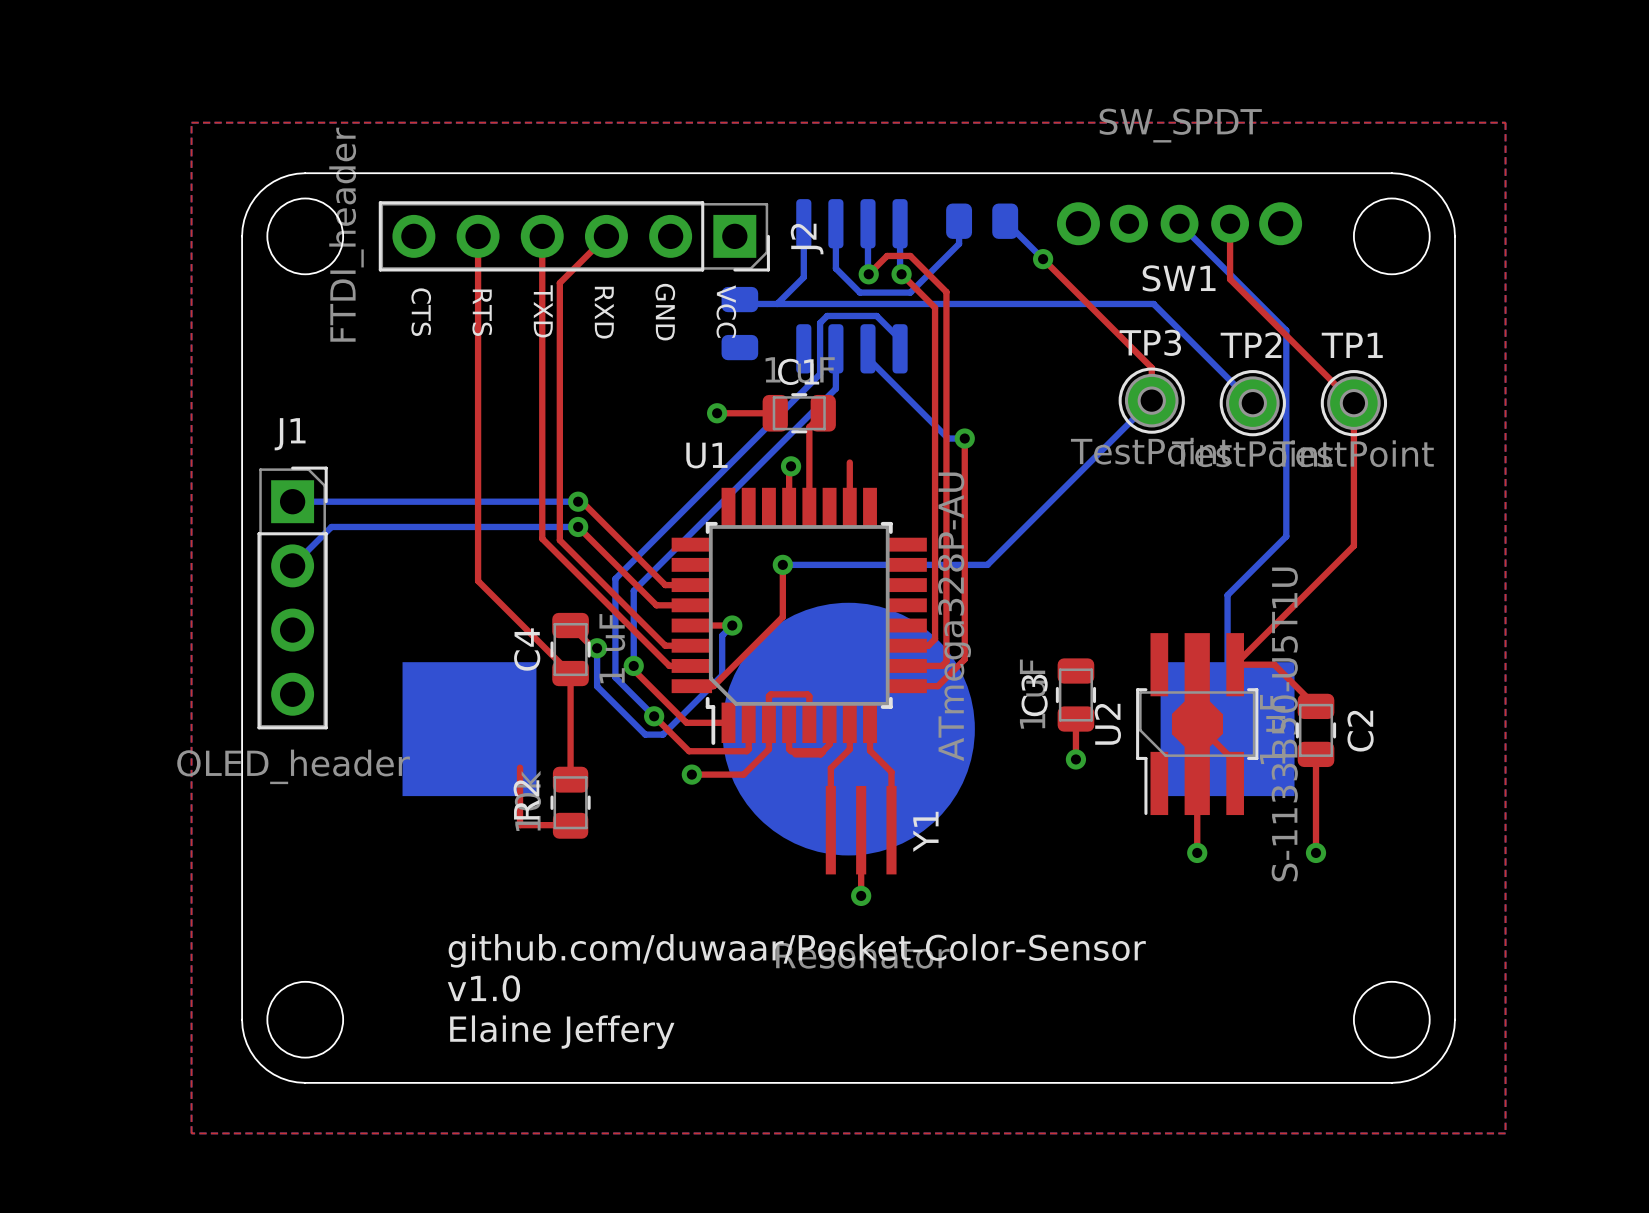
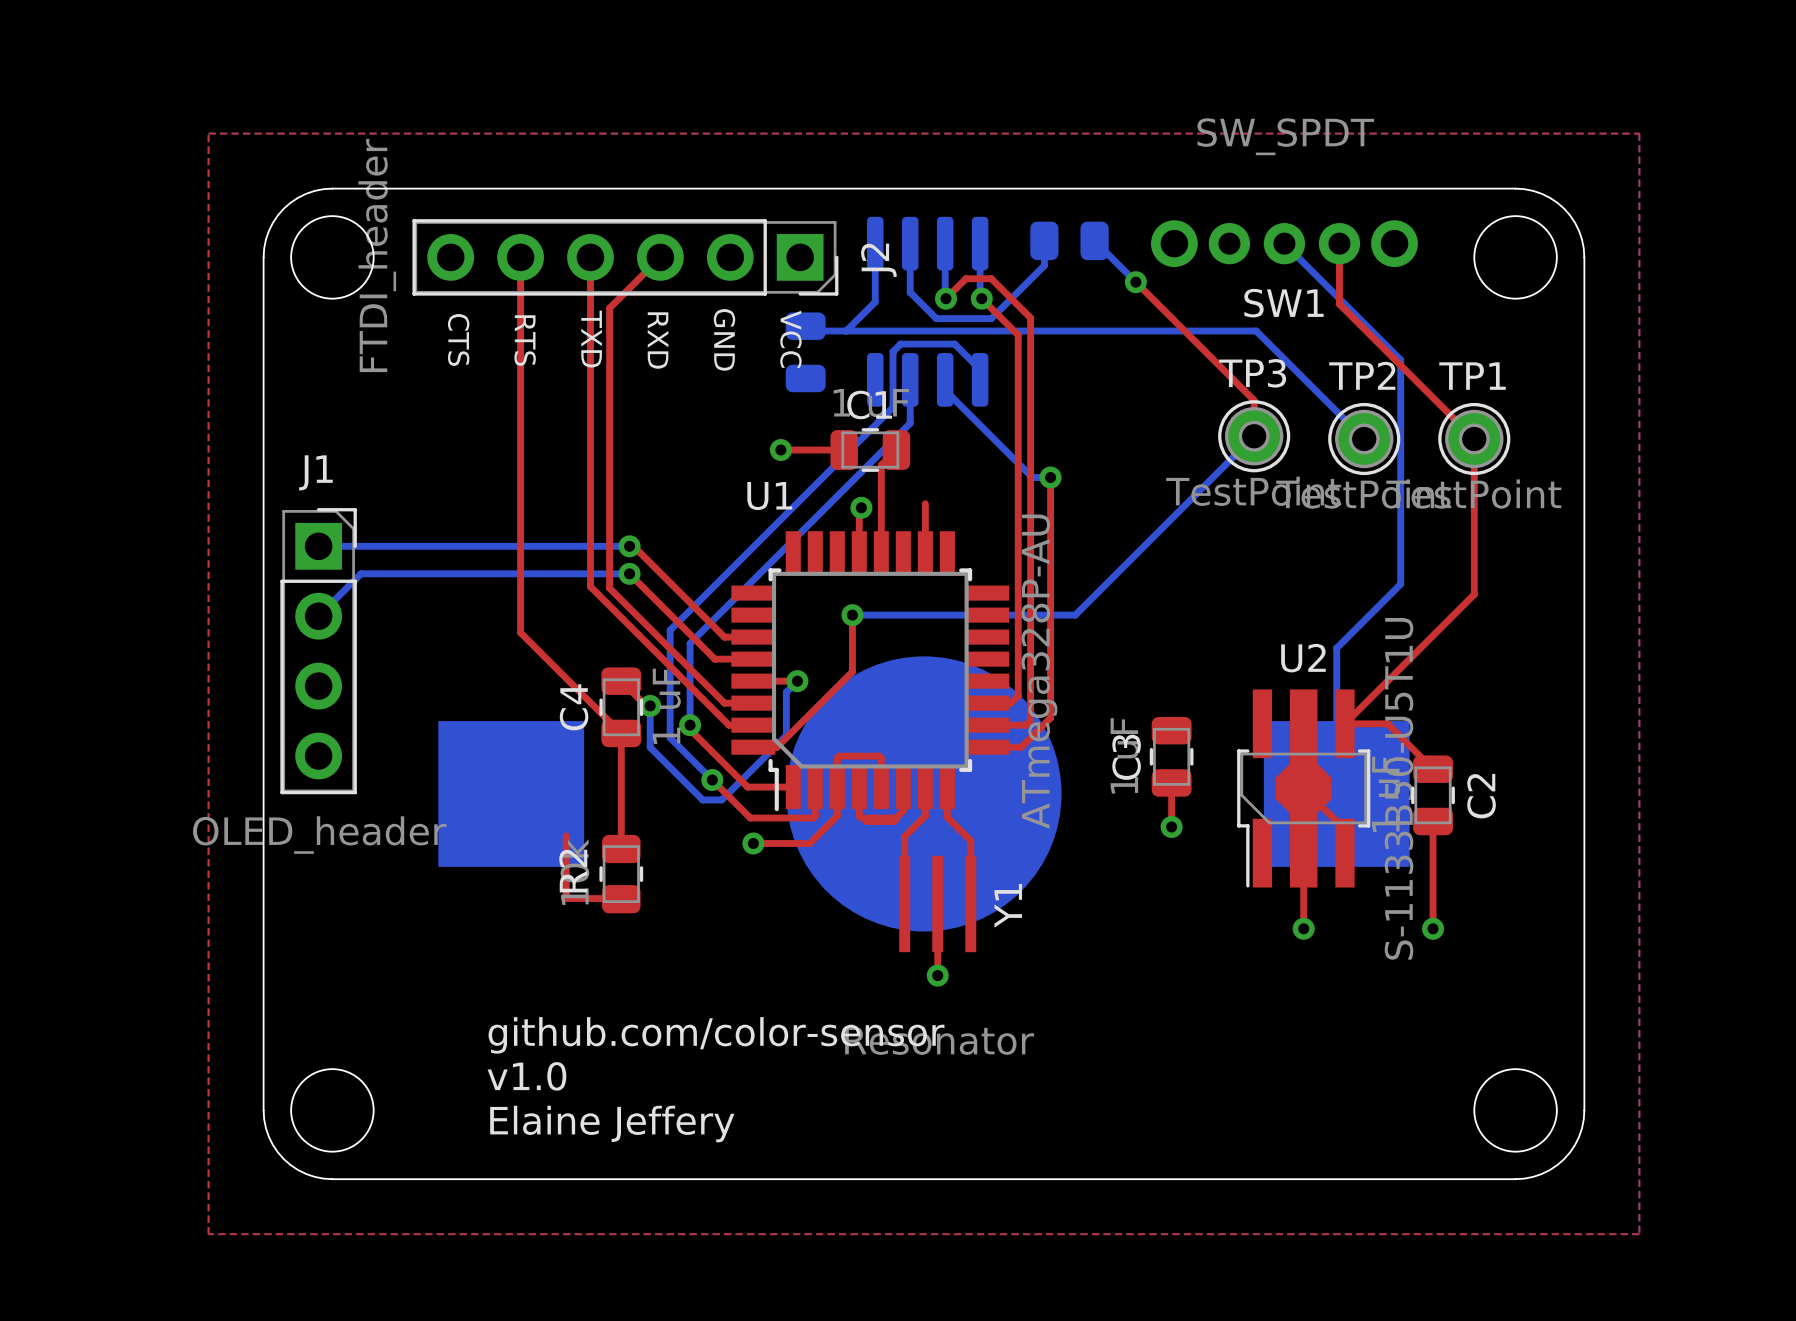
U2 name rotation: 0° (1107, 724) -> 90° clockwise (1303, 658)
U2 name position: U2 (1107, 724) -> U2 (1303, 658)
text: github.com/duwaar/Pocket-Color-Sensor (797, 950) -> github.com/color-sensor (716, 1035)

